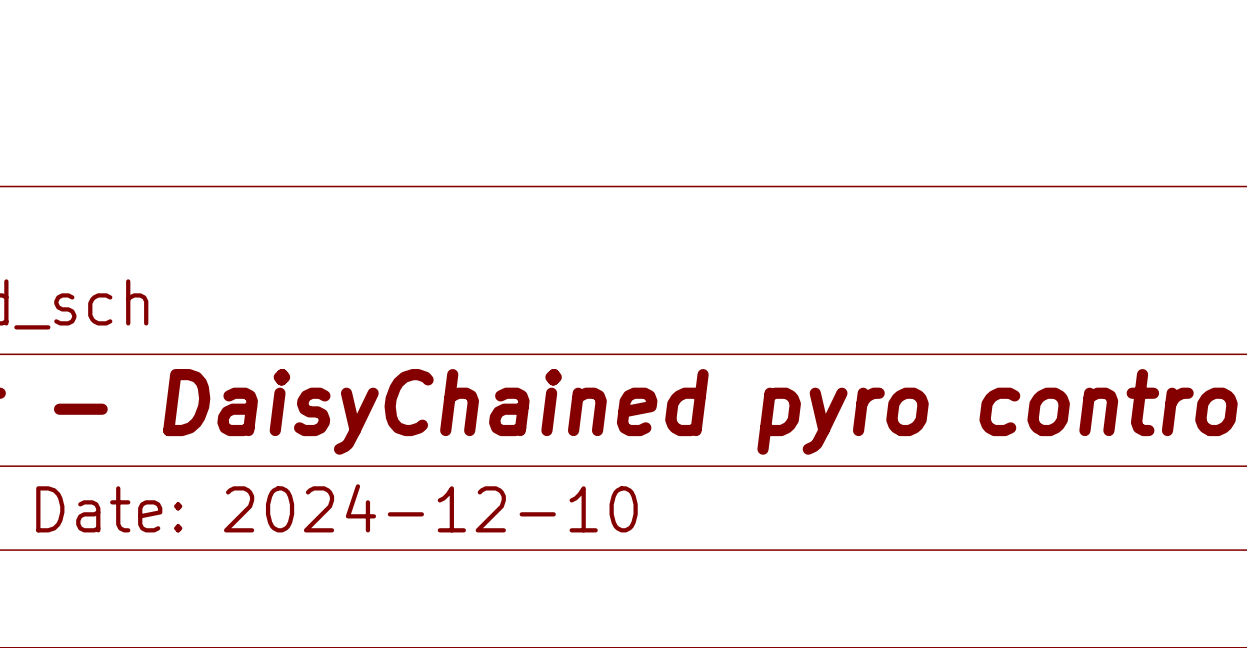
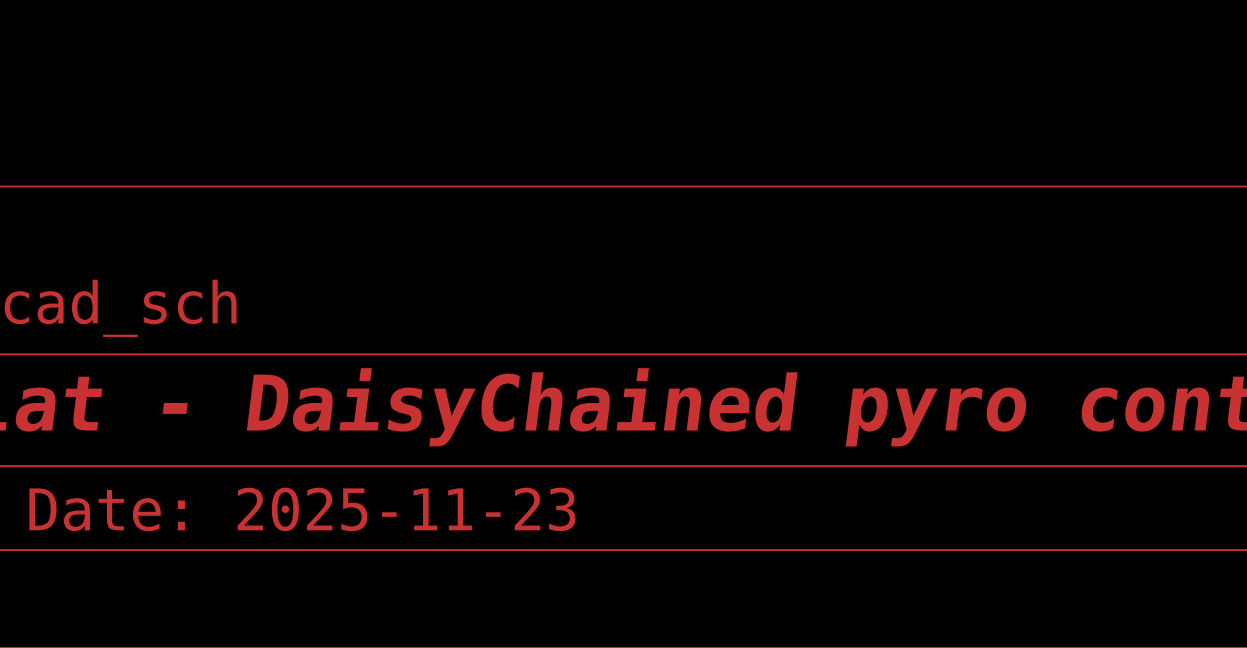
title block: Date: 2024-12-10 (336, 508) -> Date: 2025-11-23 (302, 509)

